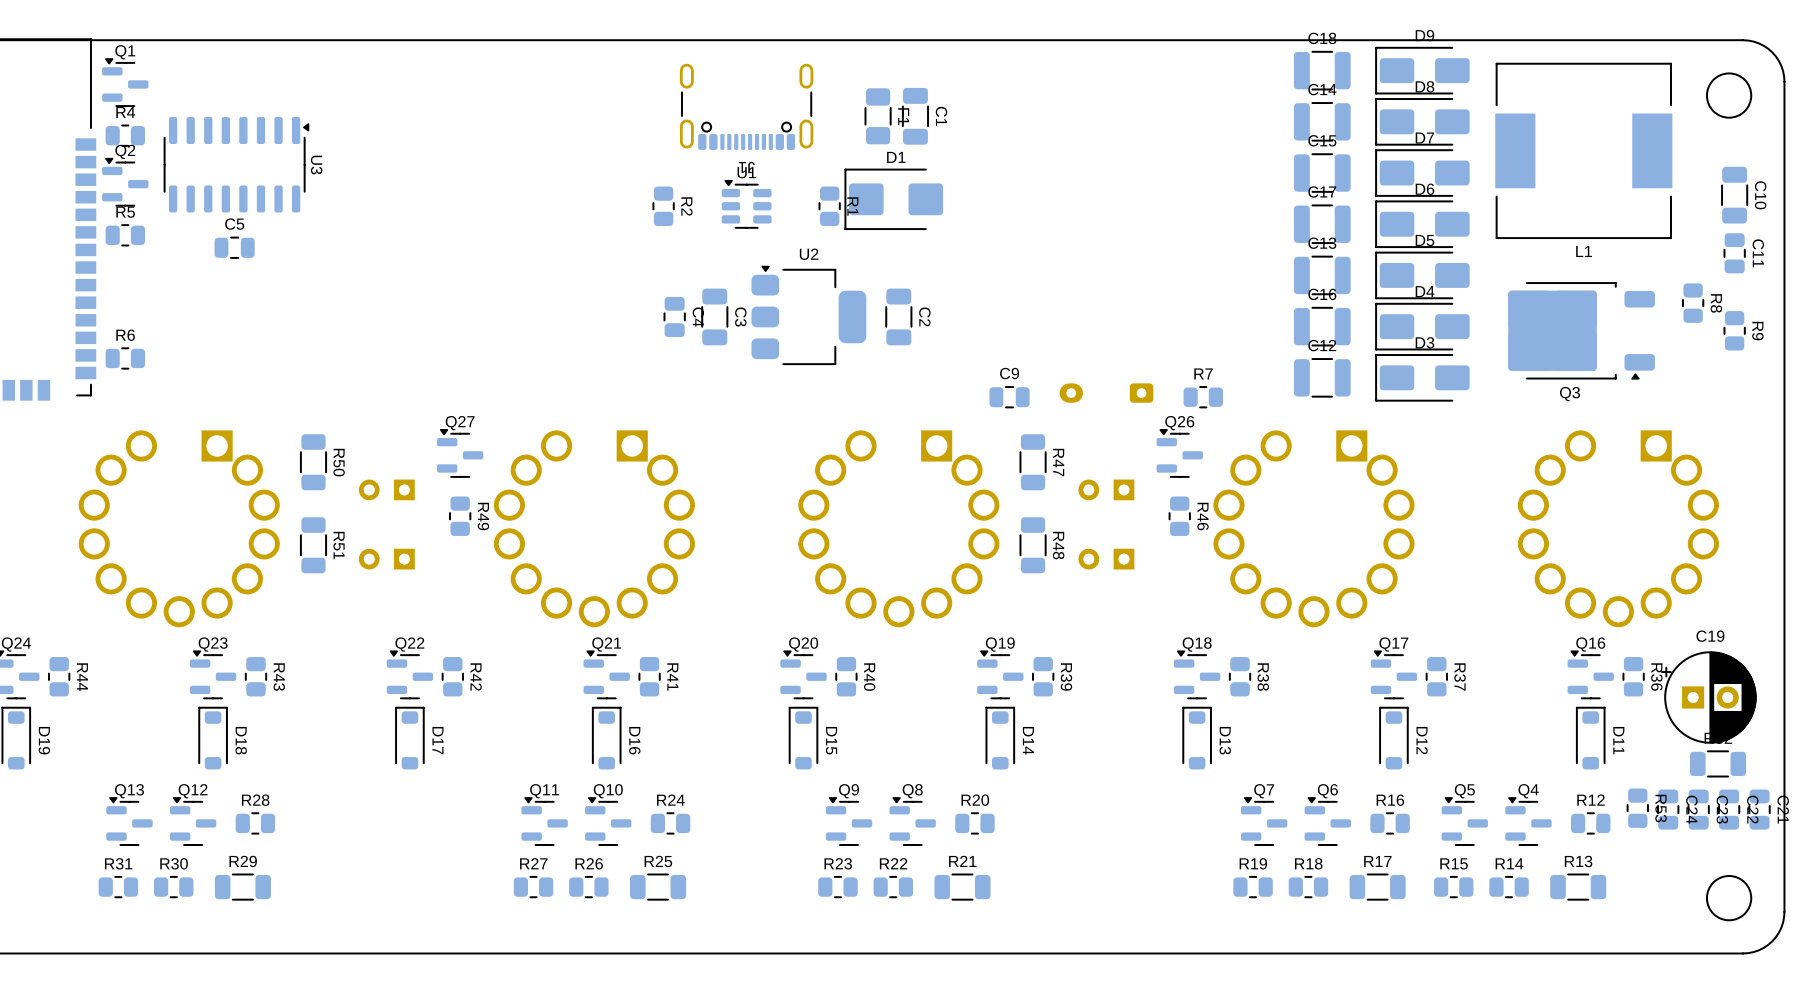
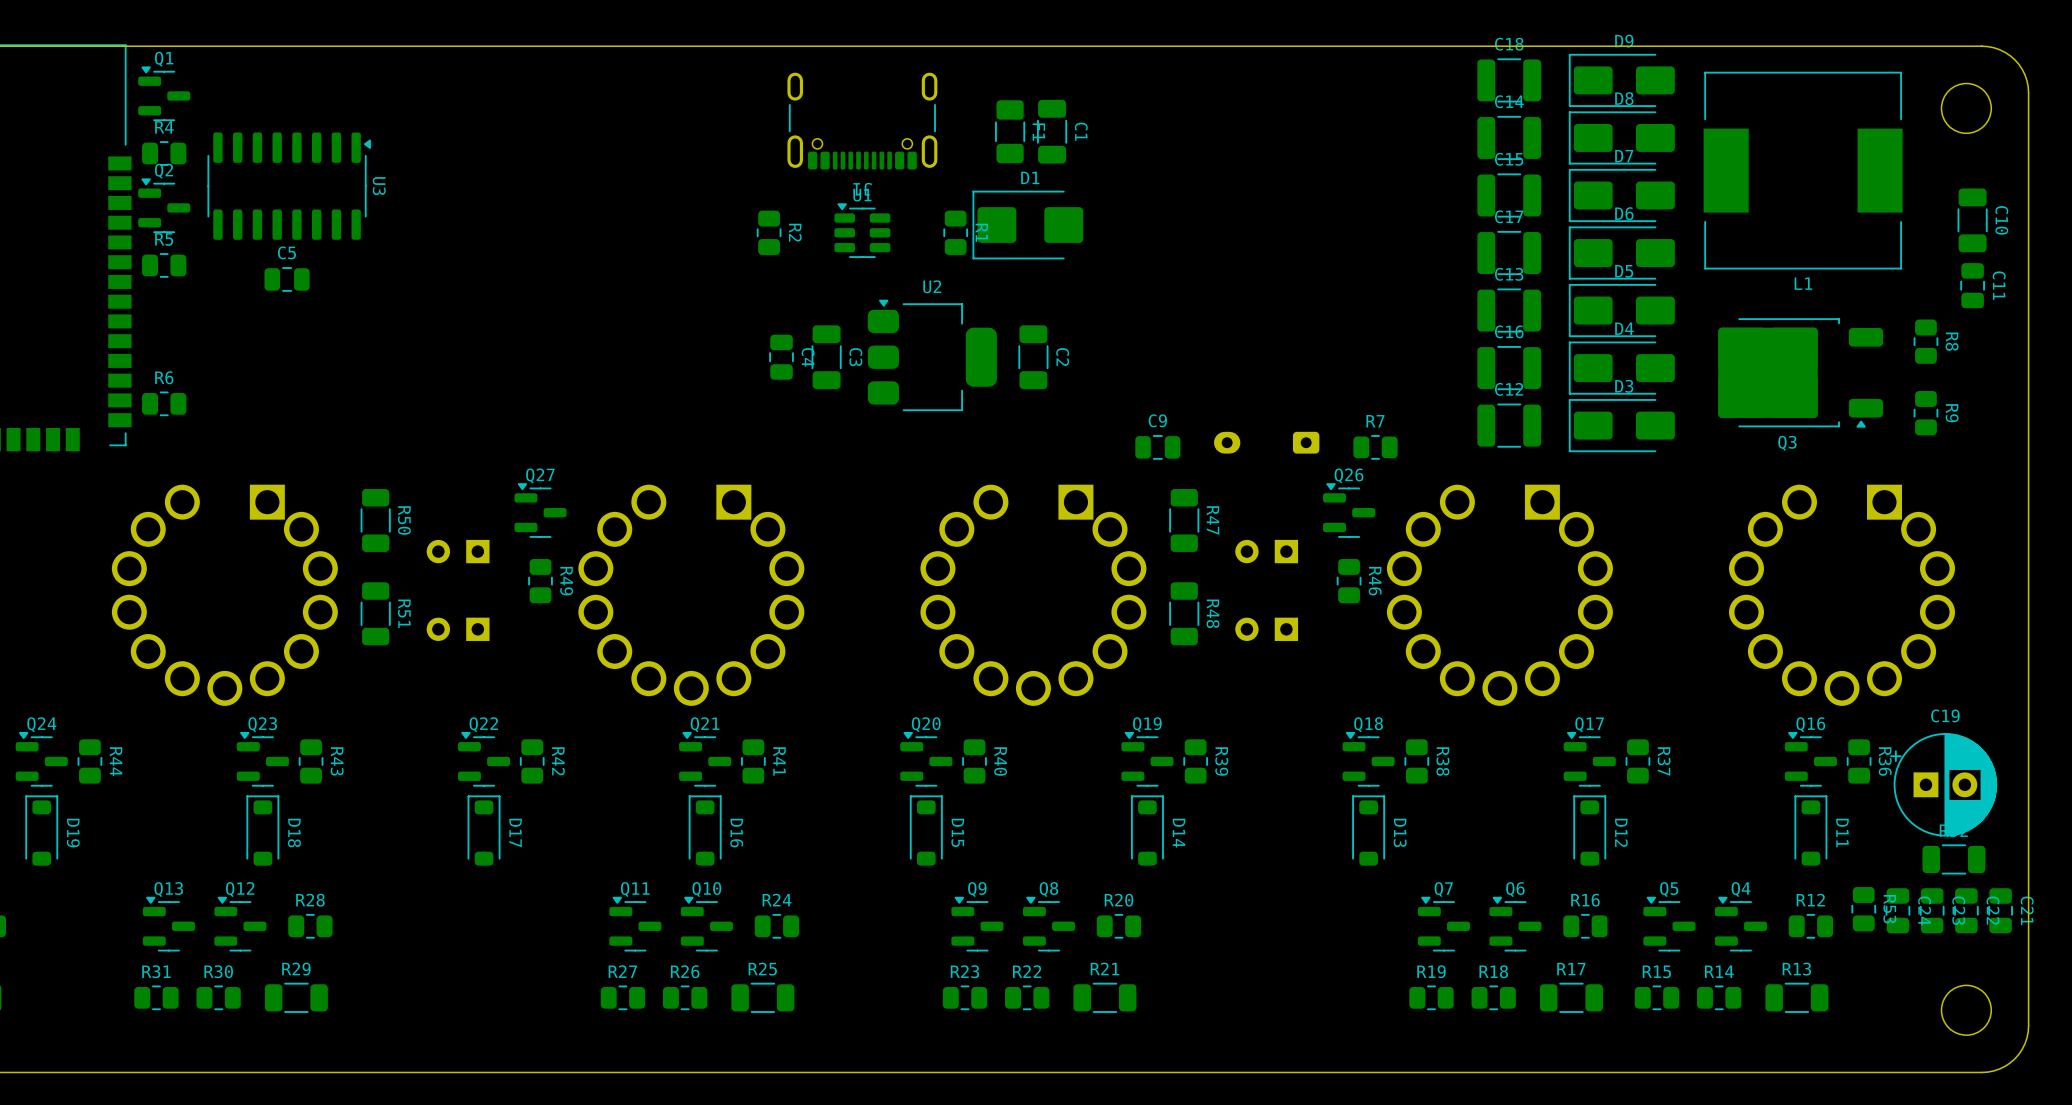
R9 position: (1734, 330) -> (1925, 413)

